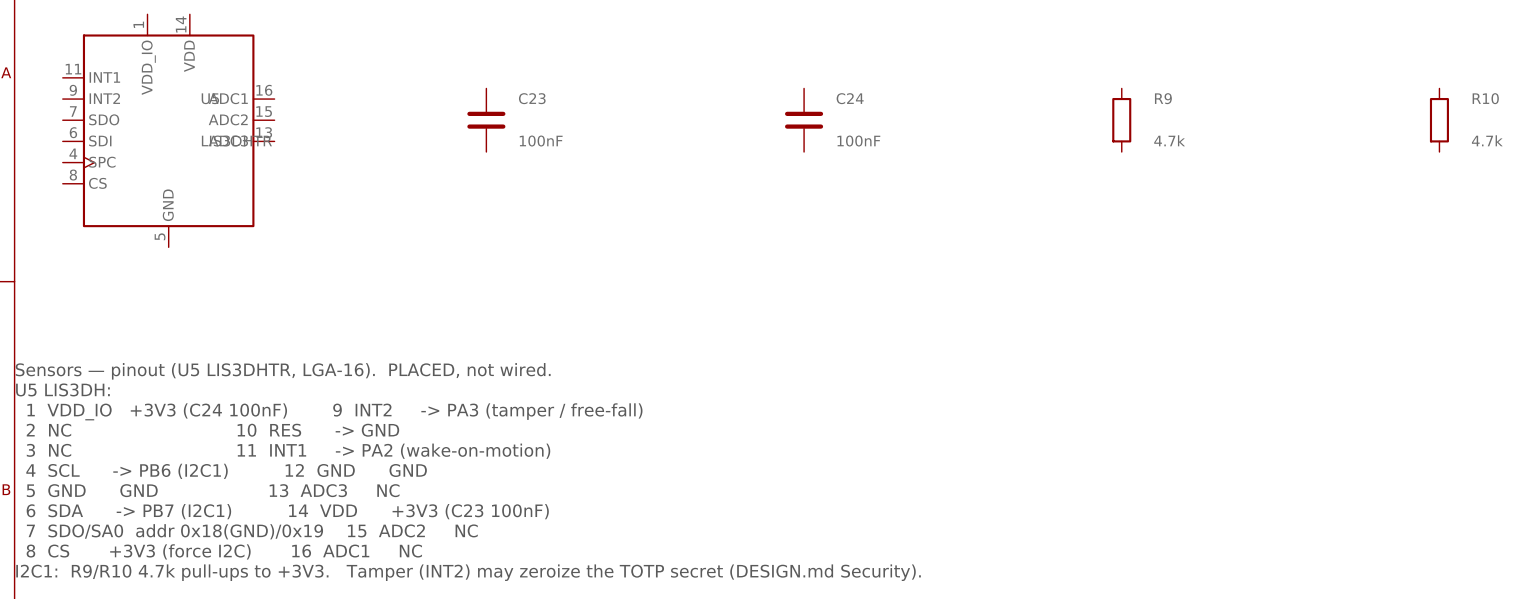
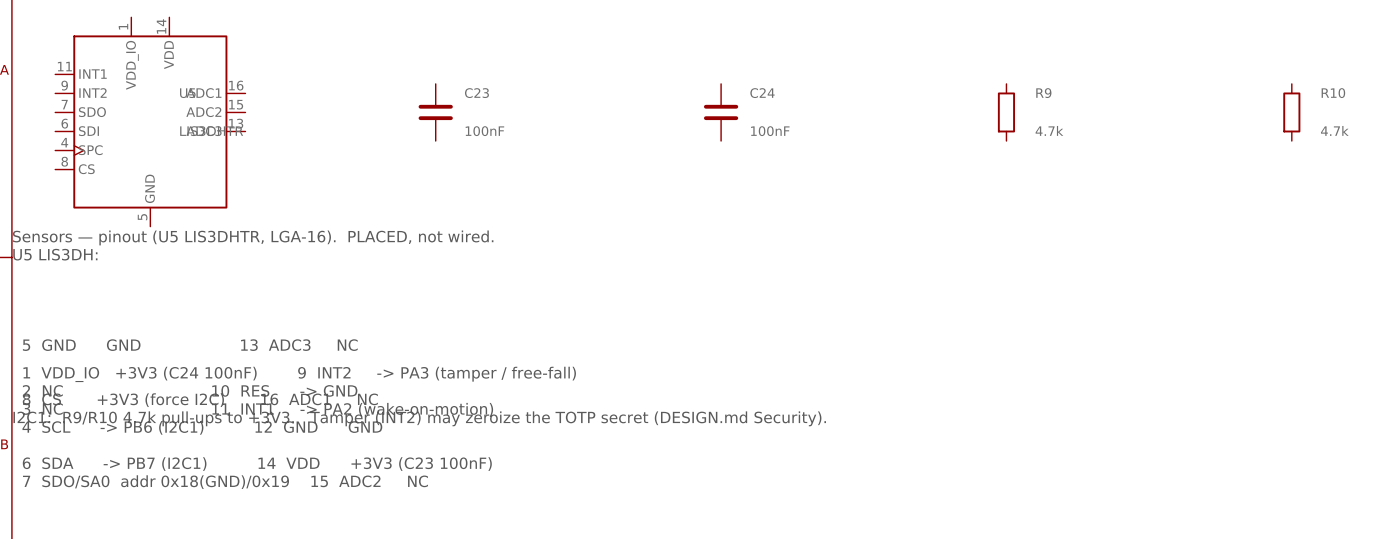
text position: Sensors — pinout (U5 LIS3DHTR, LGA-16). PLACED, not wired. (283, 371) -> Sensors — pinout (U5 LIS3DHTR, LGA-16). PLACED, not wired. (253, 237)
text position: U5 LIS3DH: (62, 389) -> U5 LIS3DH: (55, 254)
text position: 5 GND GND 13 ADC3 NC (213, 490) -> 5 GND GND 13 ADC3 NC (190, 345)
text position: 8 CS +3V3 (force I2C) 16 ADC1 NC (224, 551) -> 8 CS +3V3 (force I2C) 16 ADC1 NC (200, 400)
text position: I2C1: R9/R10 4.7k pull-ups to +3V3. Tamper (INT2) may zeroize the TOTP secret (DESIGN.md Security). (468, 572) -> I2C1: R9/R10 4.7k pull-ups to +3V3. Tamper (INT2) may zeroize the TOTP secret (DESIGN.md Security). (419, 418)

